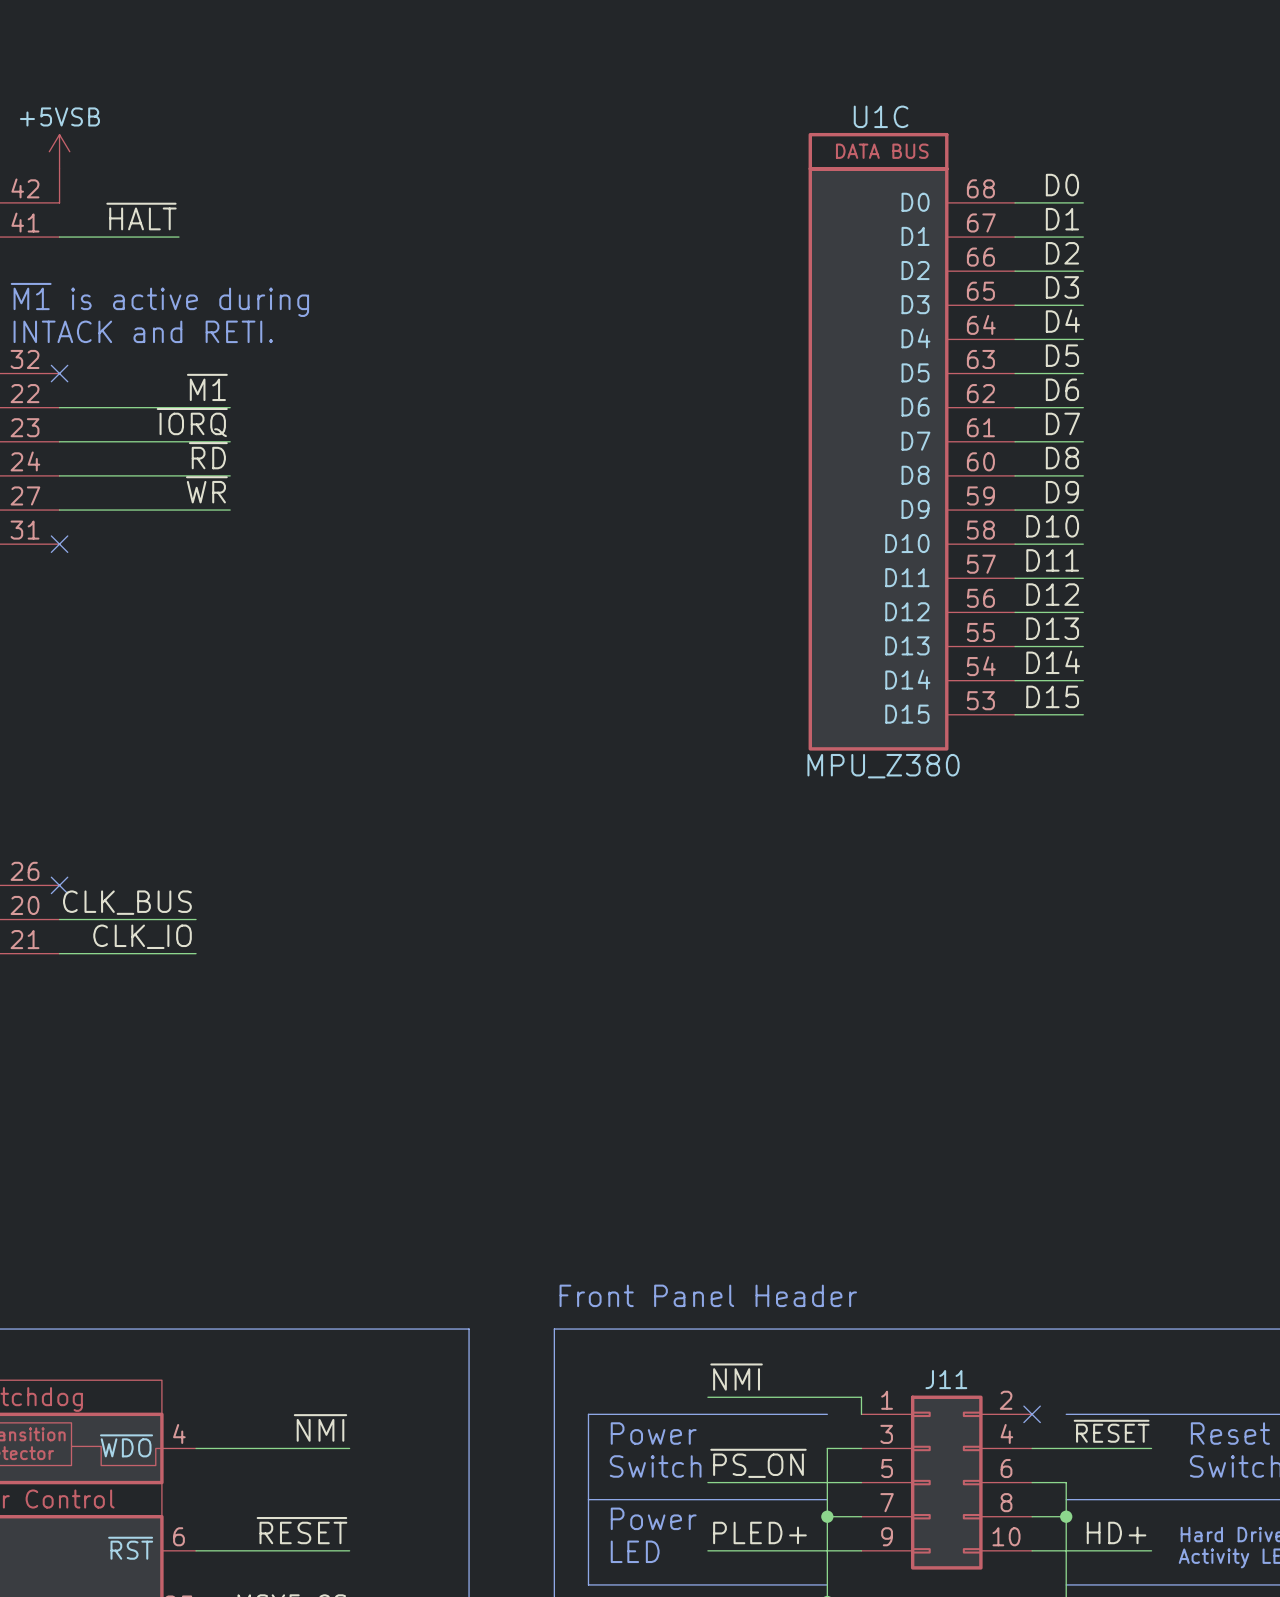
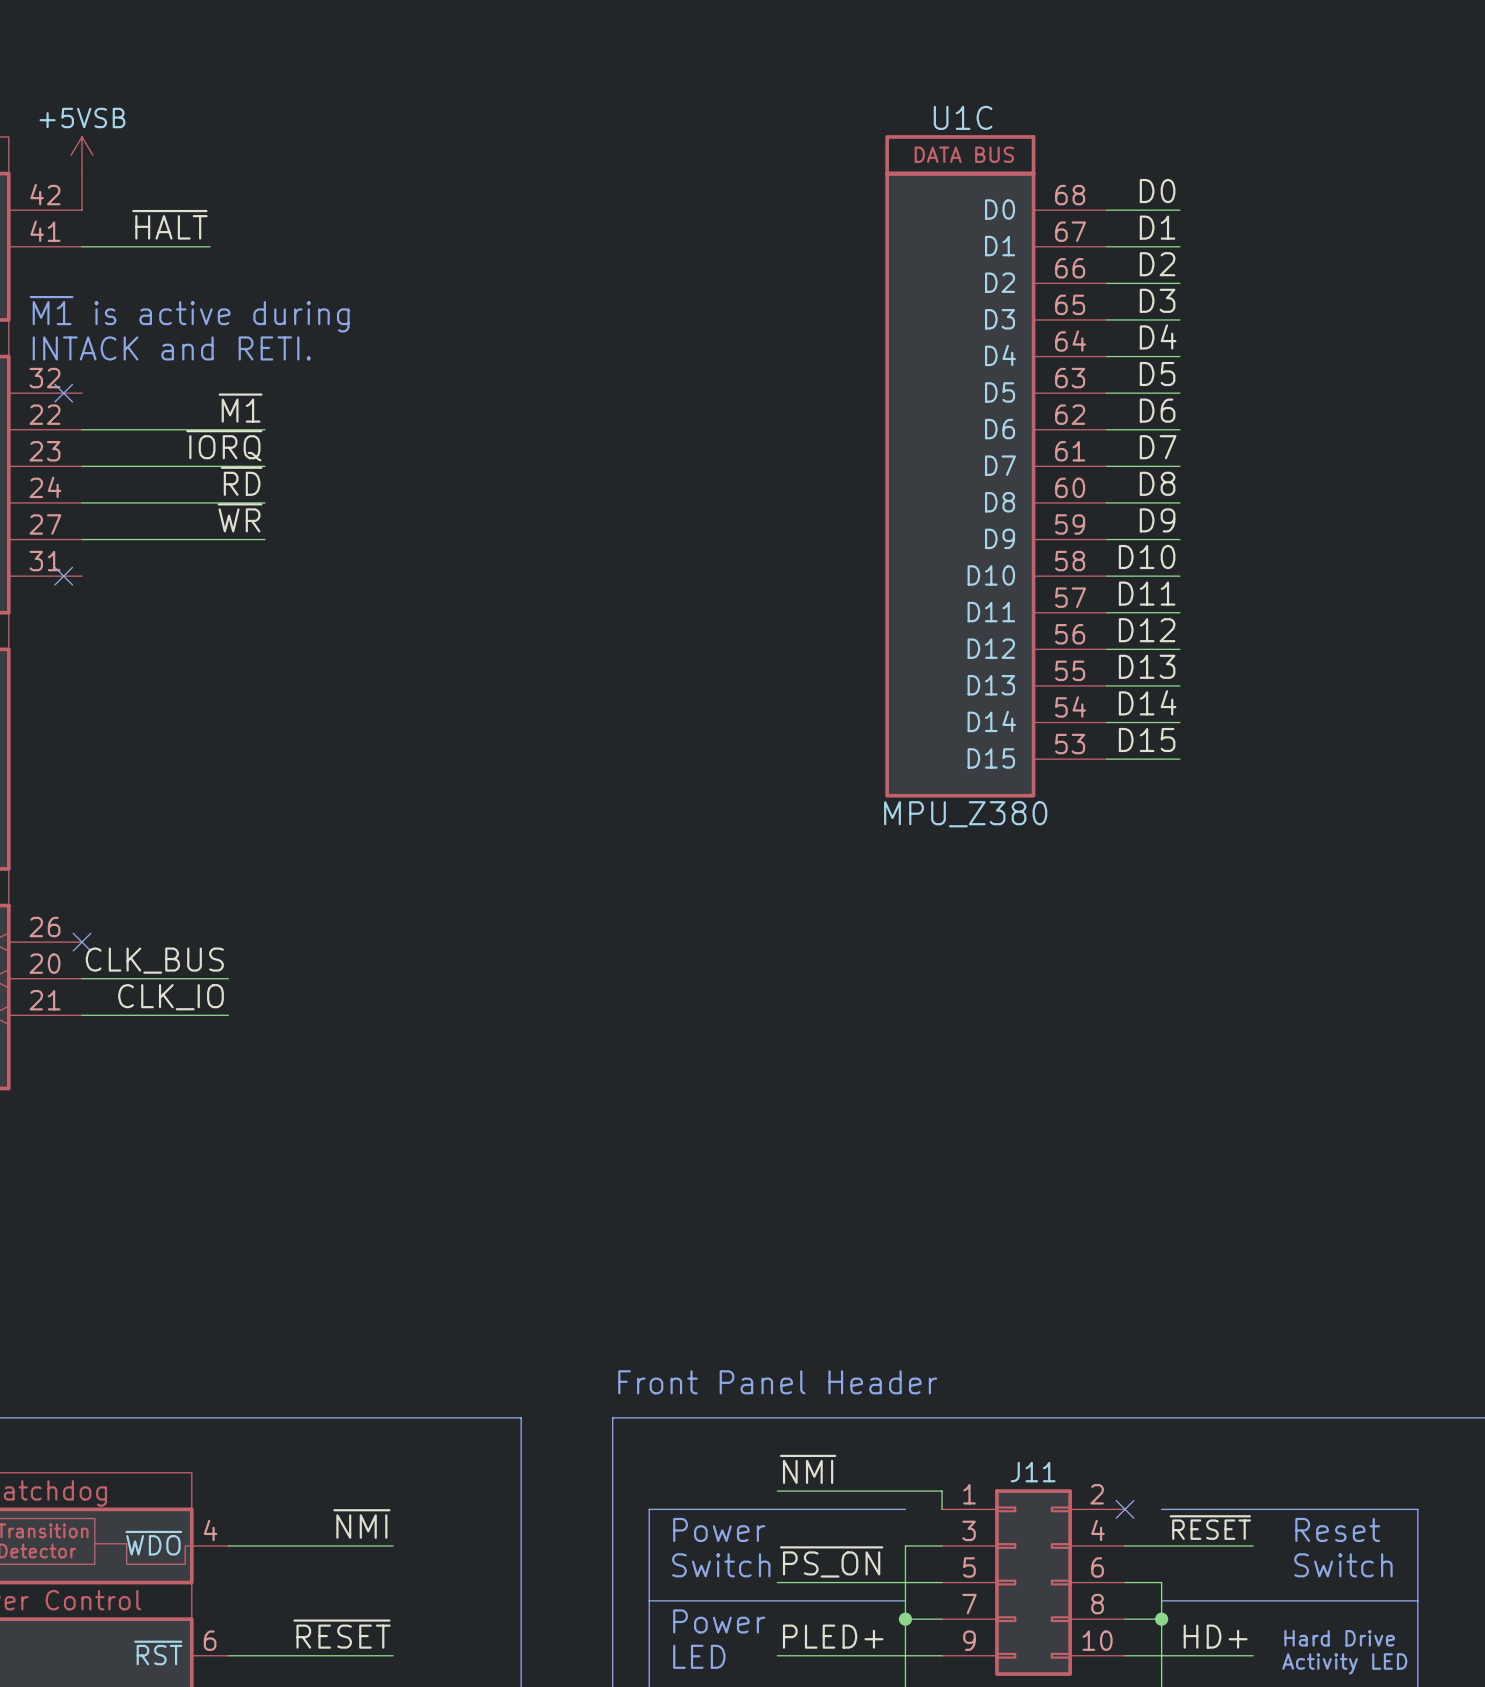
no-connect mark position: (59, 373) -> (63, 393)
no-connect mark position: (59, 544) -> (63, 576)

